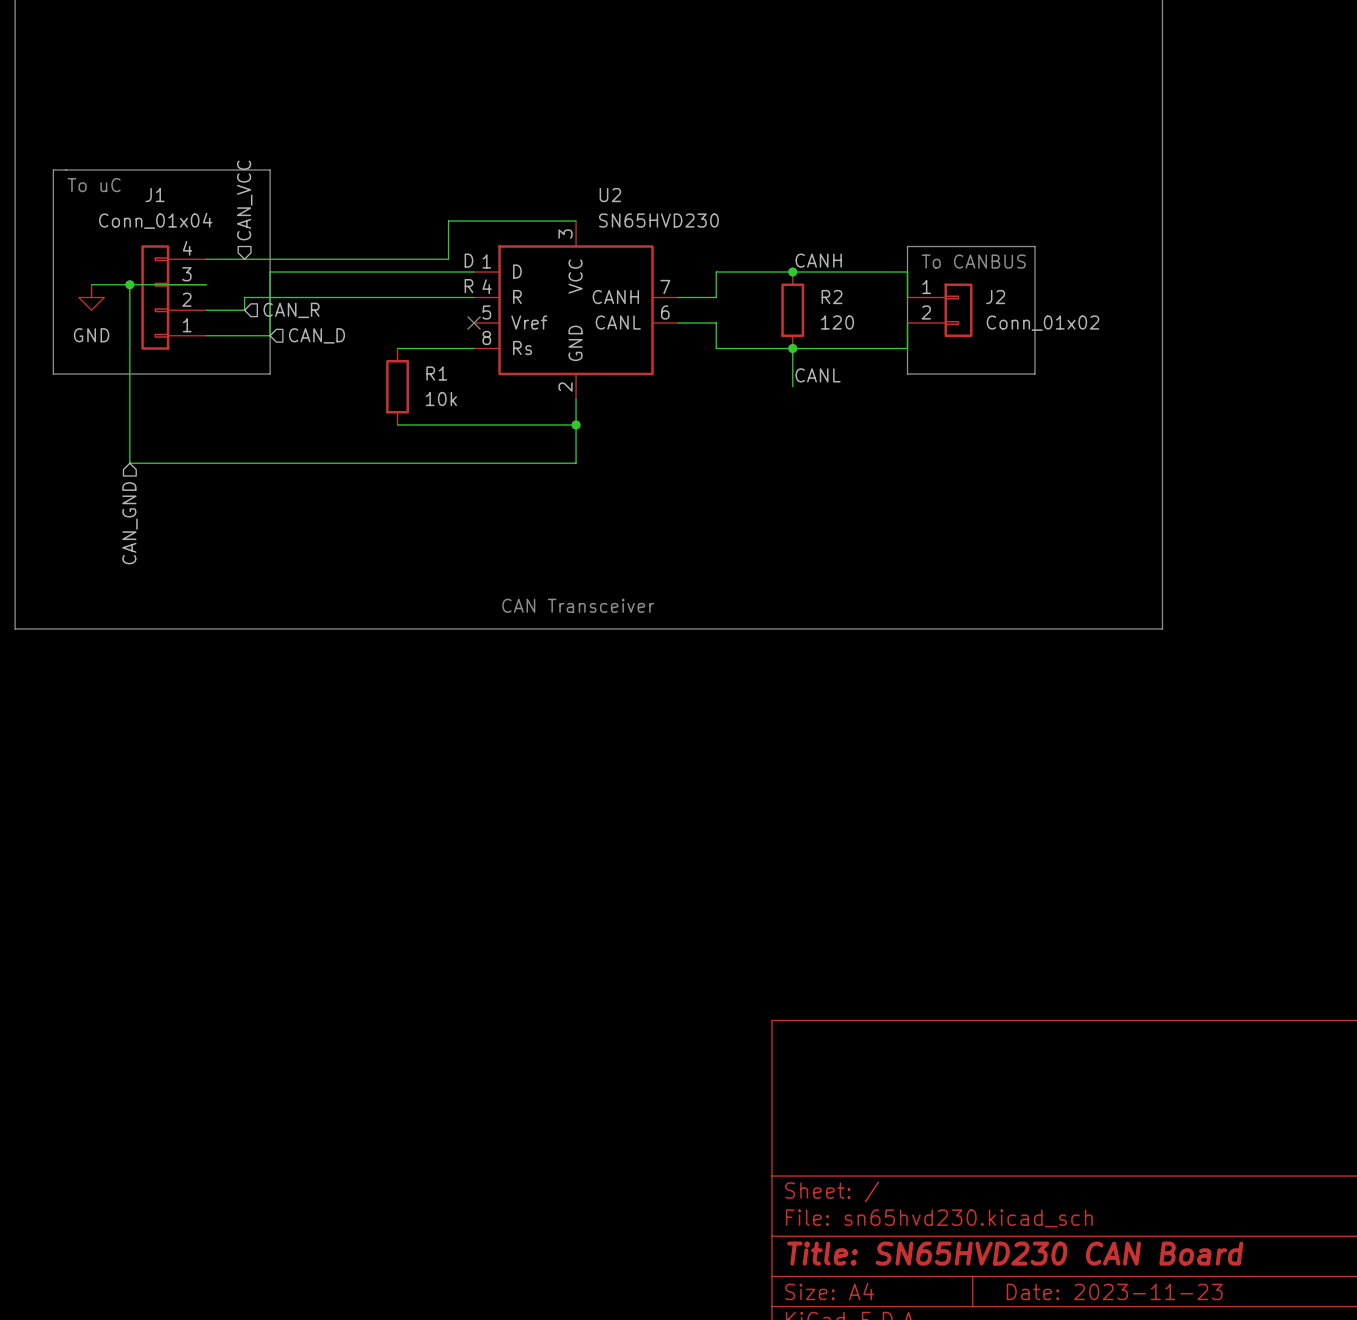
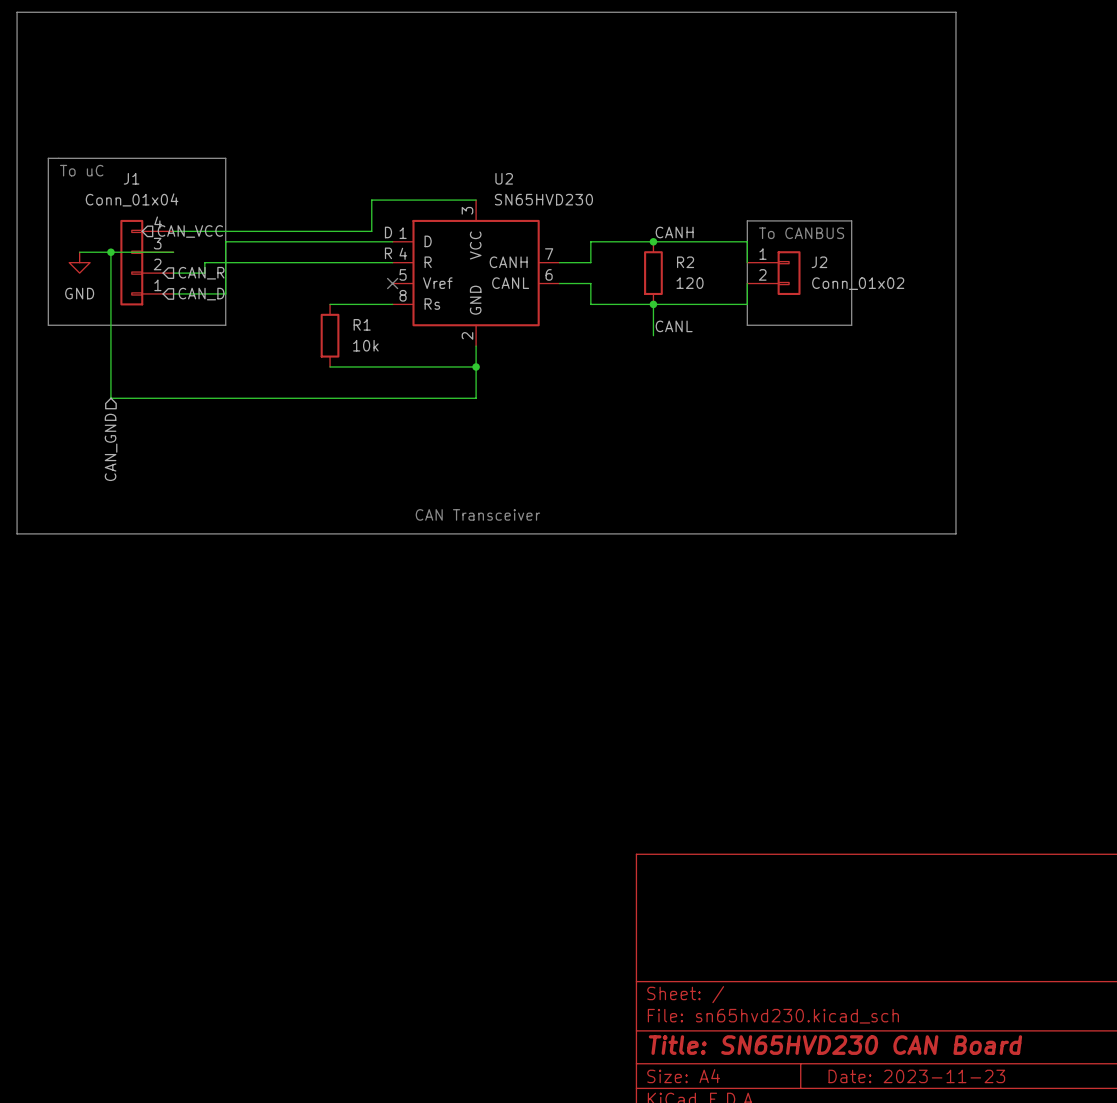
hierarchical label rotation: 0° (244, 200) -> 90° clockwise (190, 231)
hierarchical label position: CAN_R (291, 310) -> CAN_R (201, 273)
hierarchical label position: CAN_D (317, 335) -> CAN_D (201, 294)

